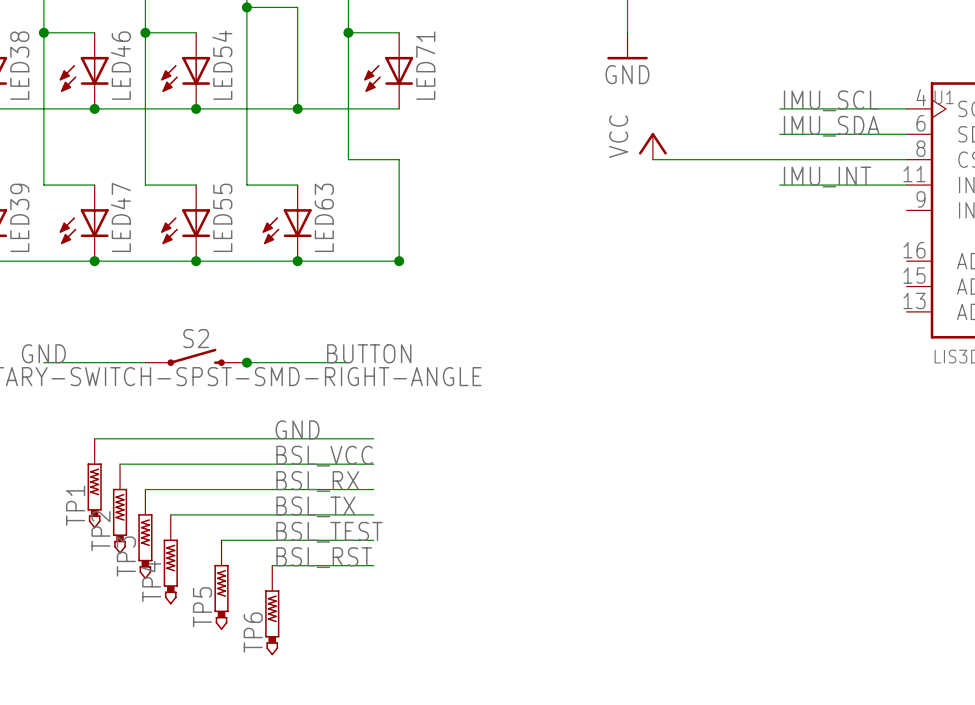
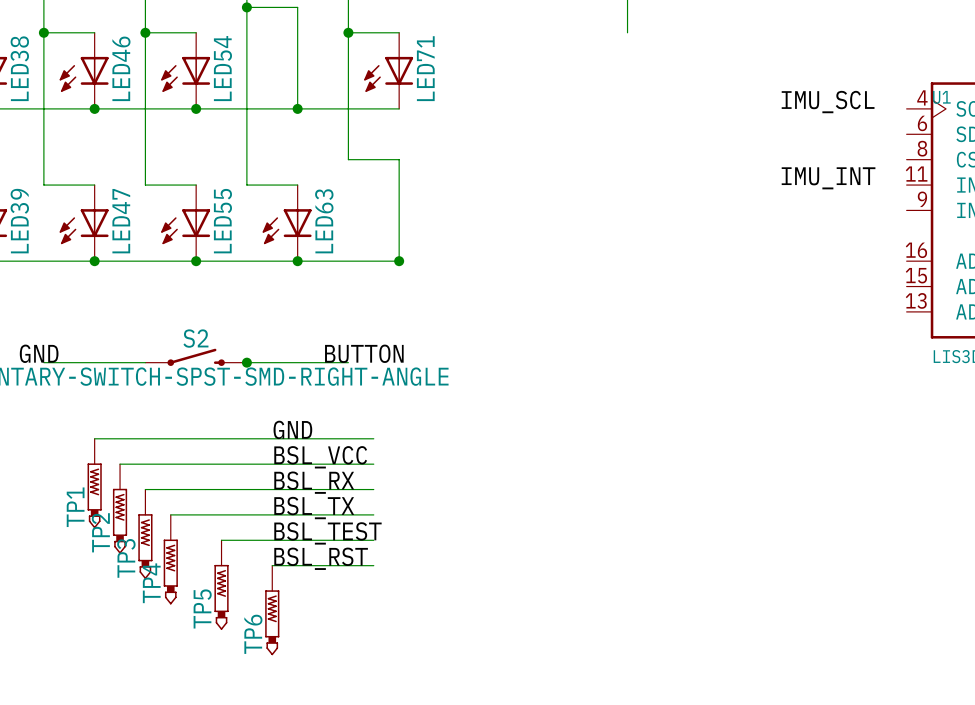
power symbol: GND (627, 46) -> none
wire: (779, 108) (906, 108) -> none
label: IMU_SDA (831, 126) -> none
wire: (779, 134) (906, 134) -> none
power symbol: VCC (652, 146) -> none
wire: (652, 159) (906, 159) -> none
wire: (779, 185) (906, 185) -> none

